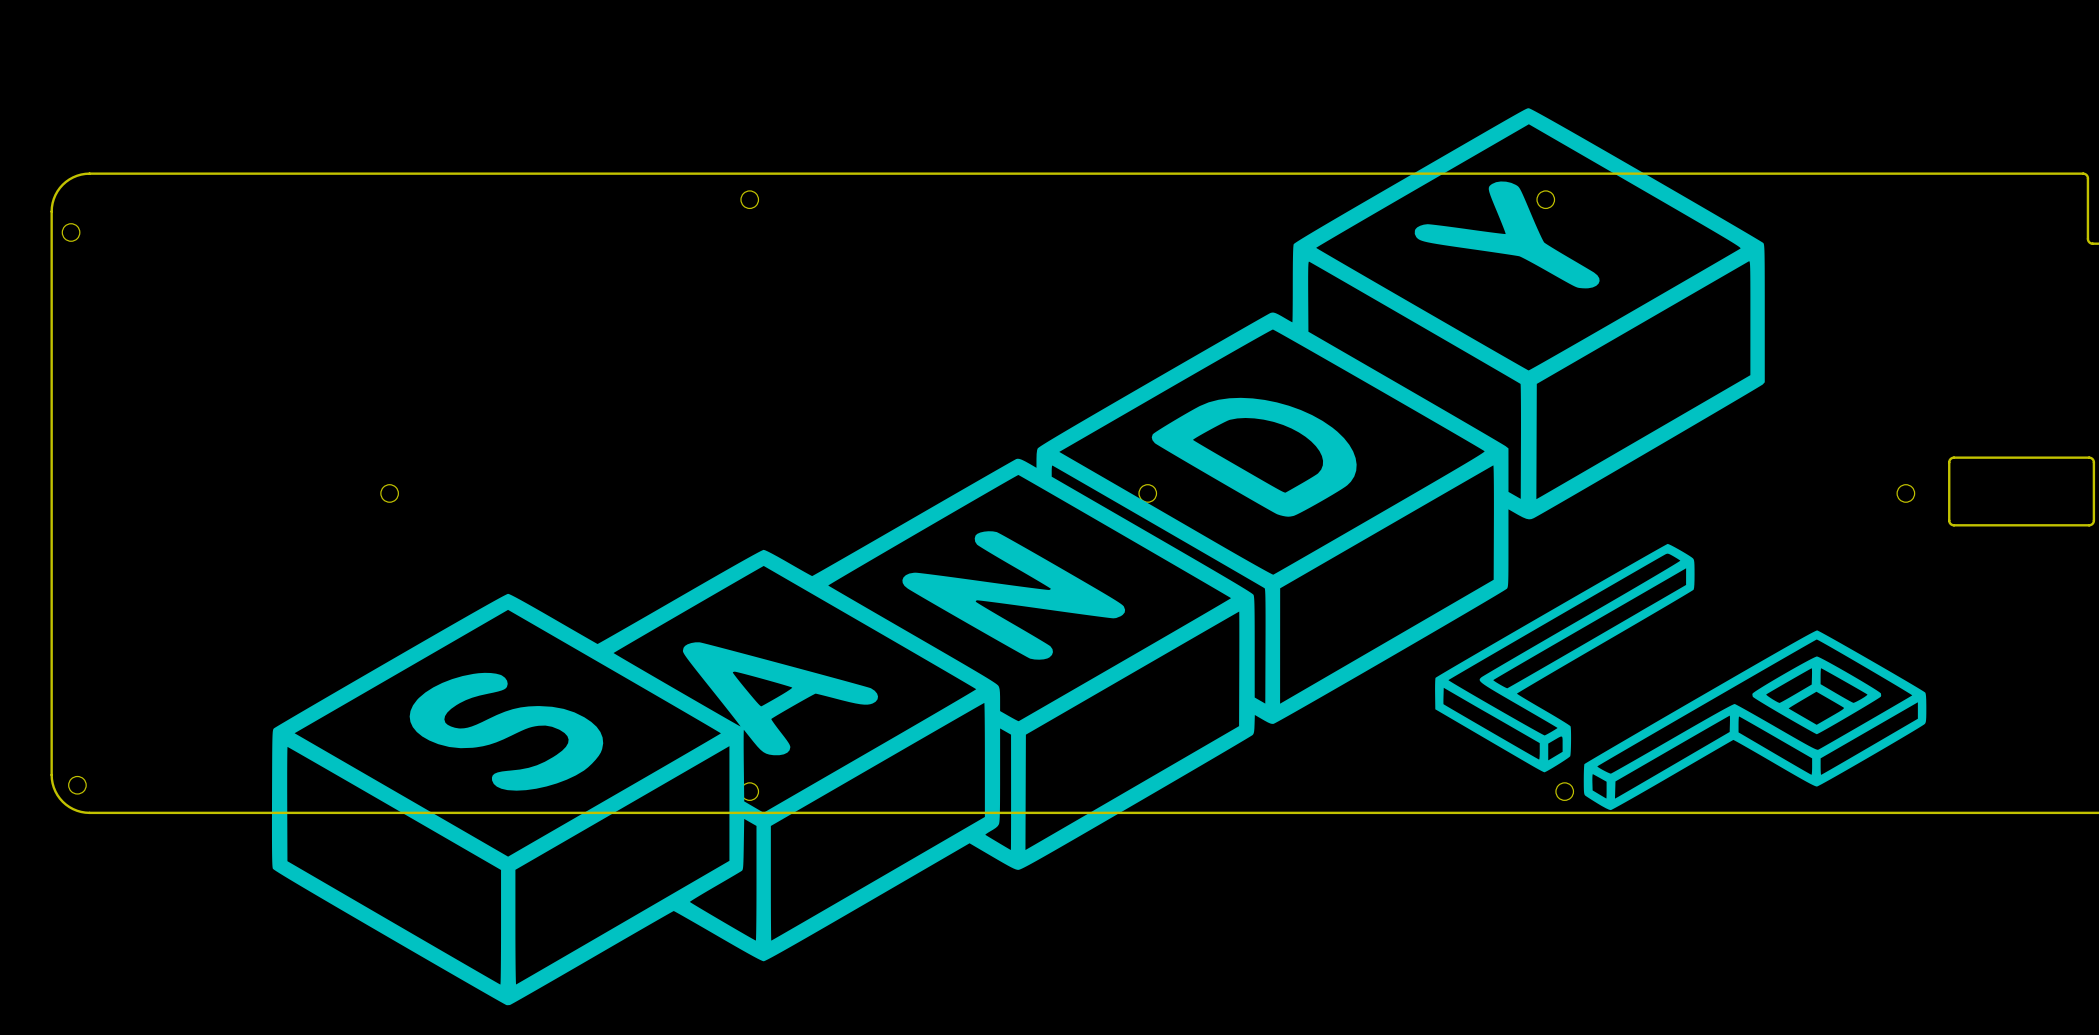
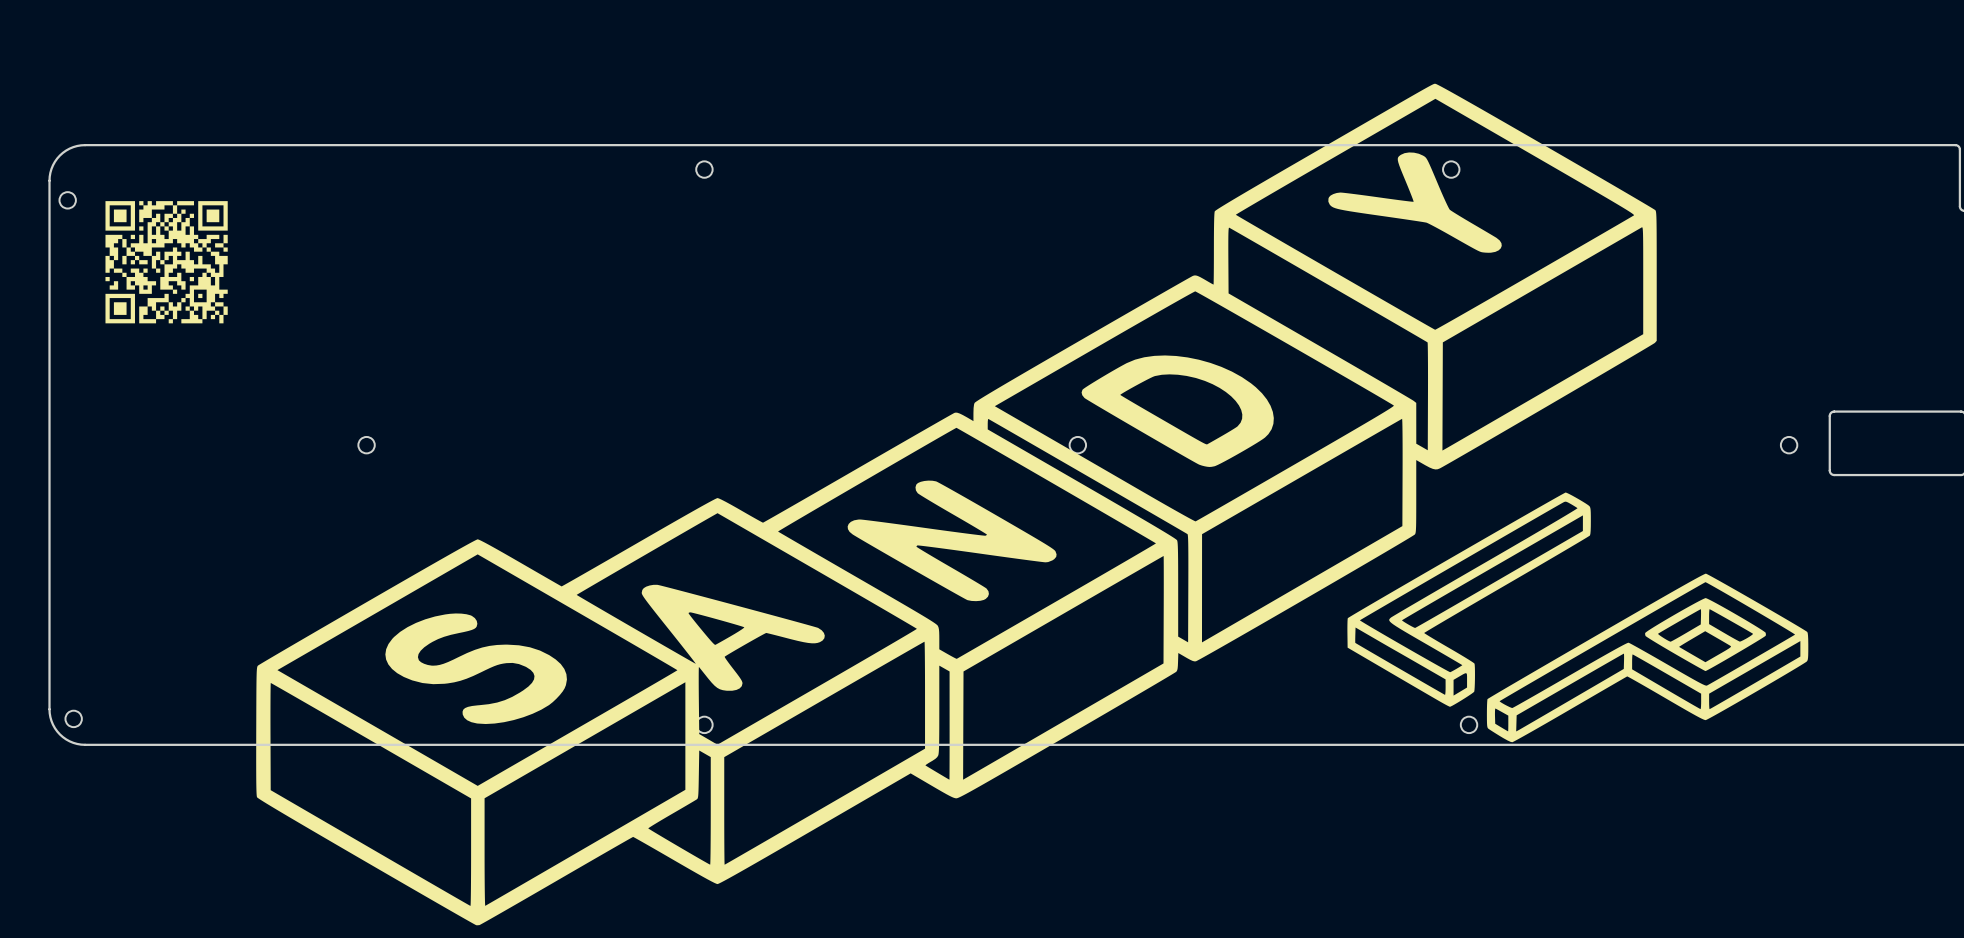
drawing: none -> [105, 201, 228, 324]

